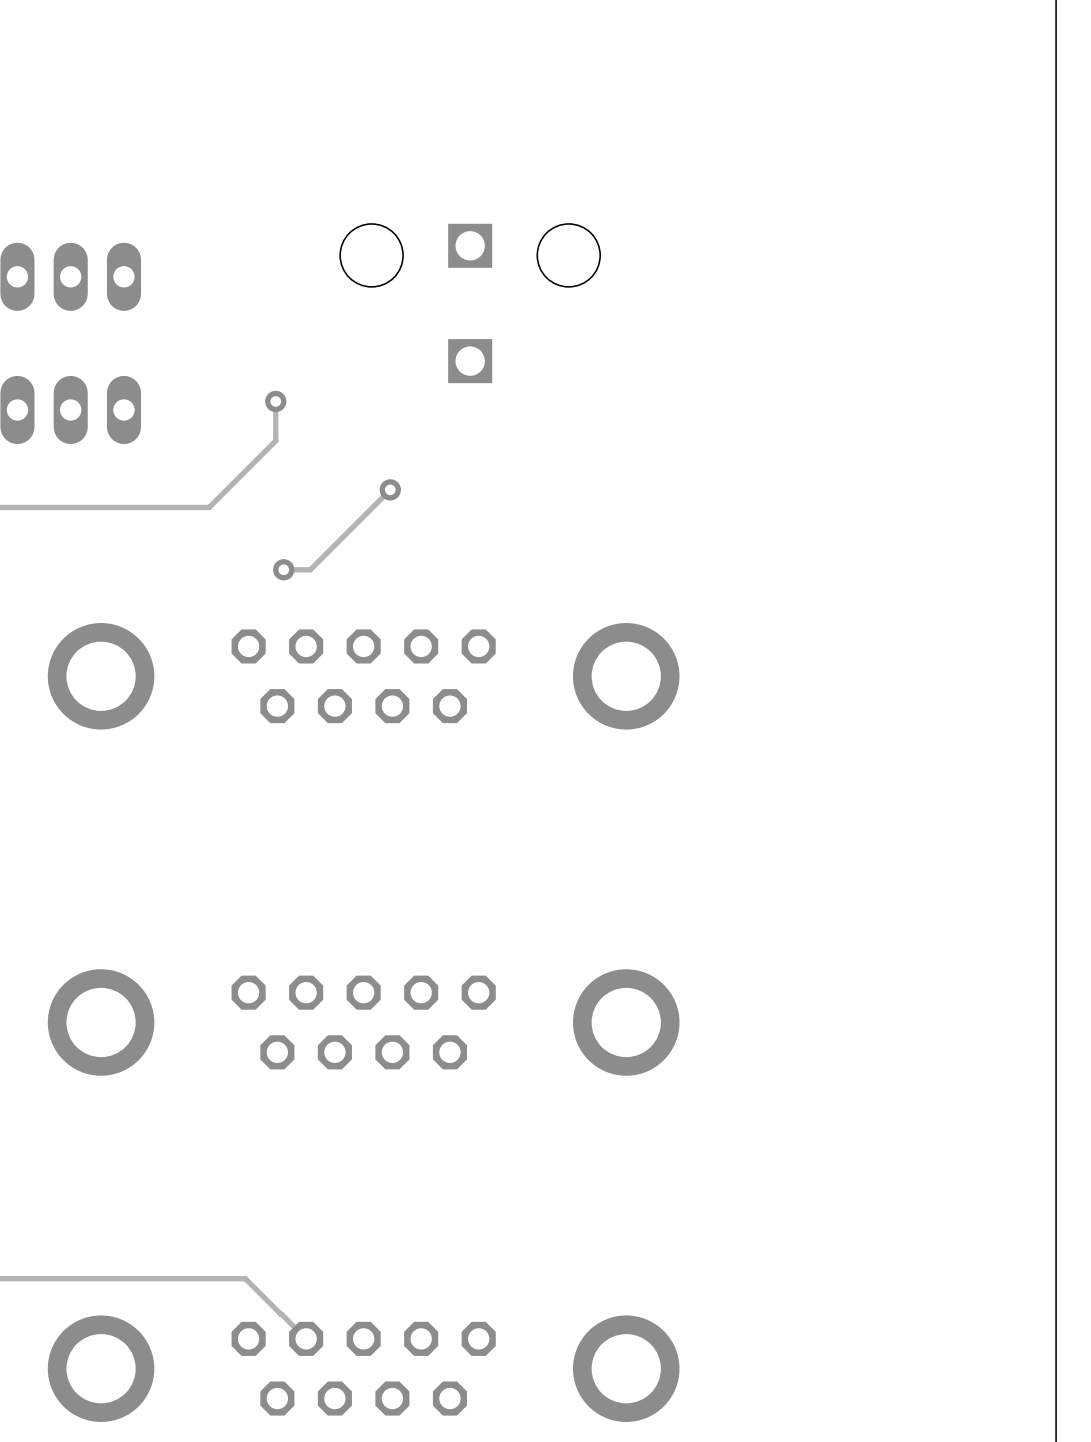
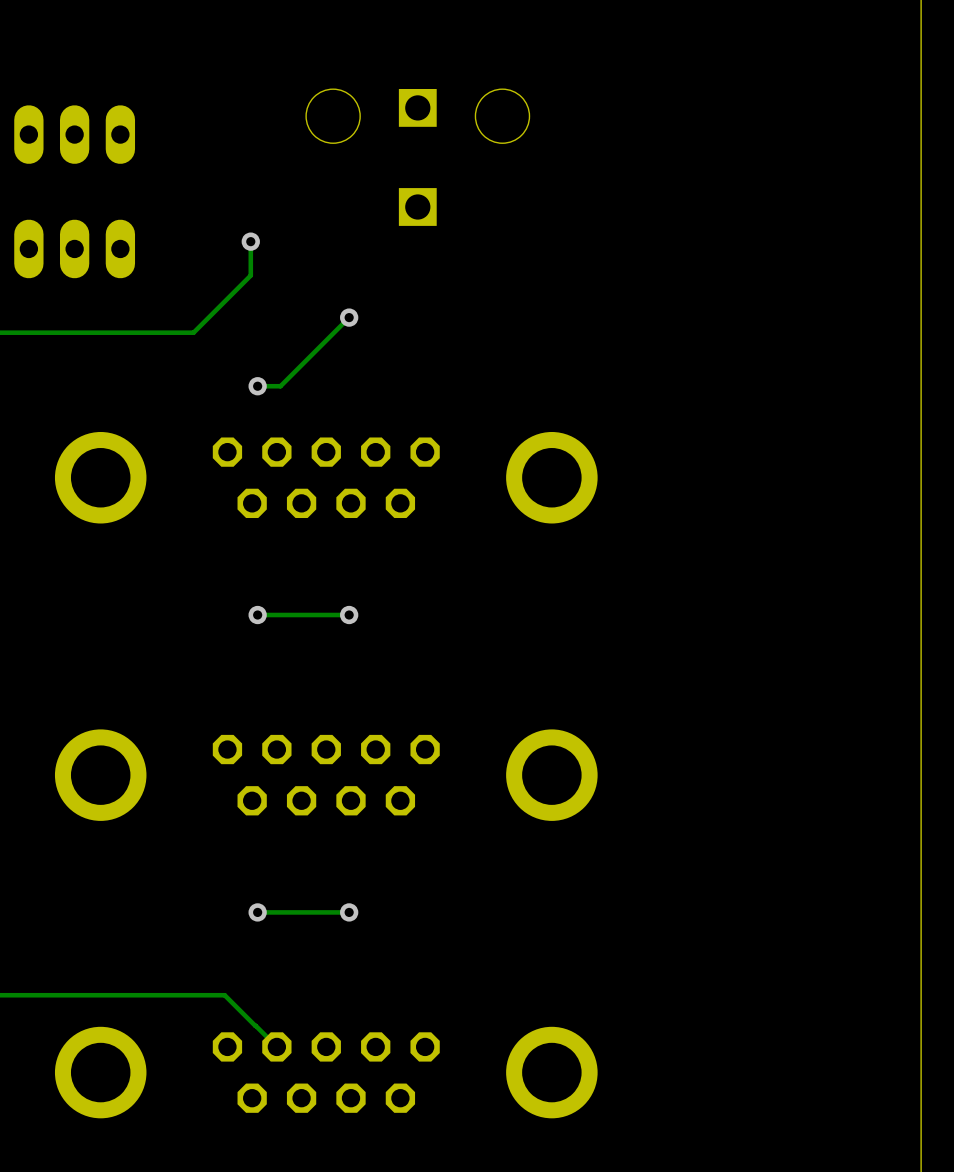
via: none -> (257, 615)
track: none -> (349, 615) (257, 615)
via: none -> (349, 615)
via: none -> (257, 912)
track: none -> (349, 912) (257, 912)
via: none -> (349, 912)

